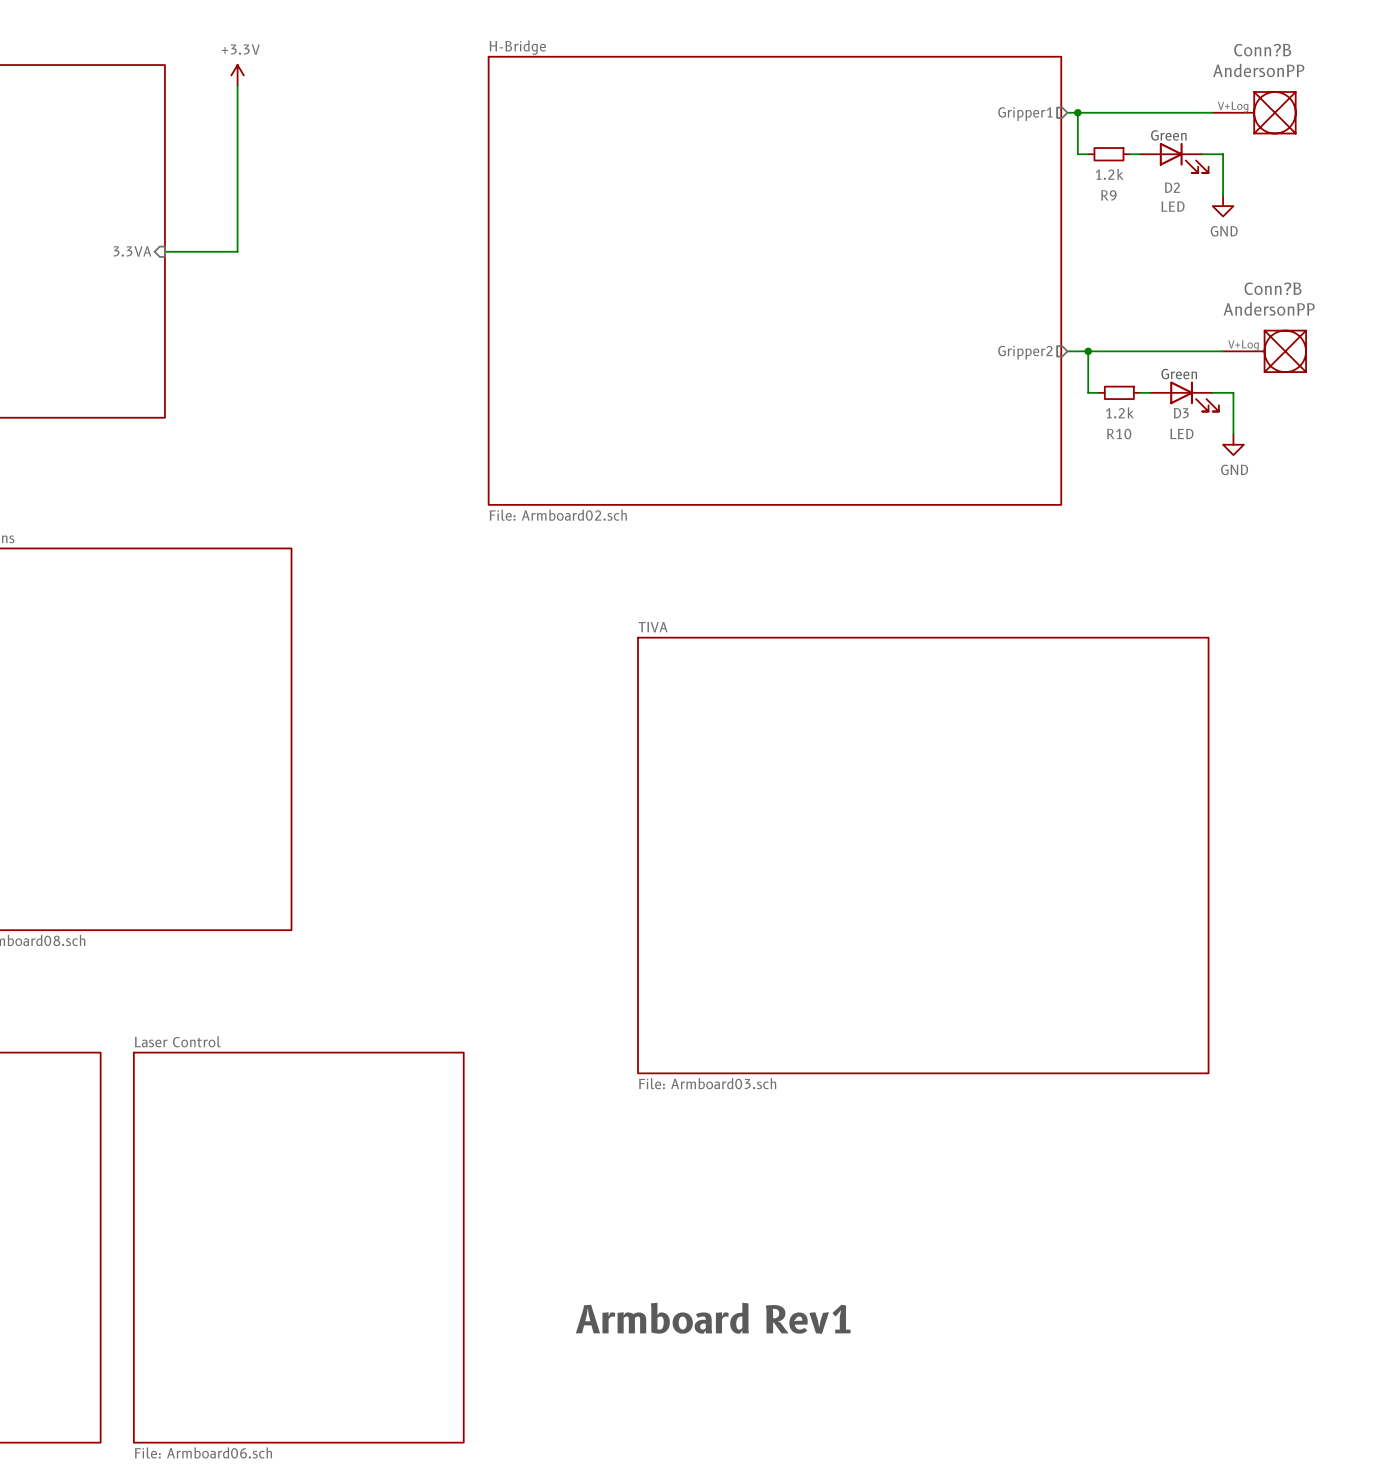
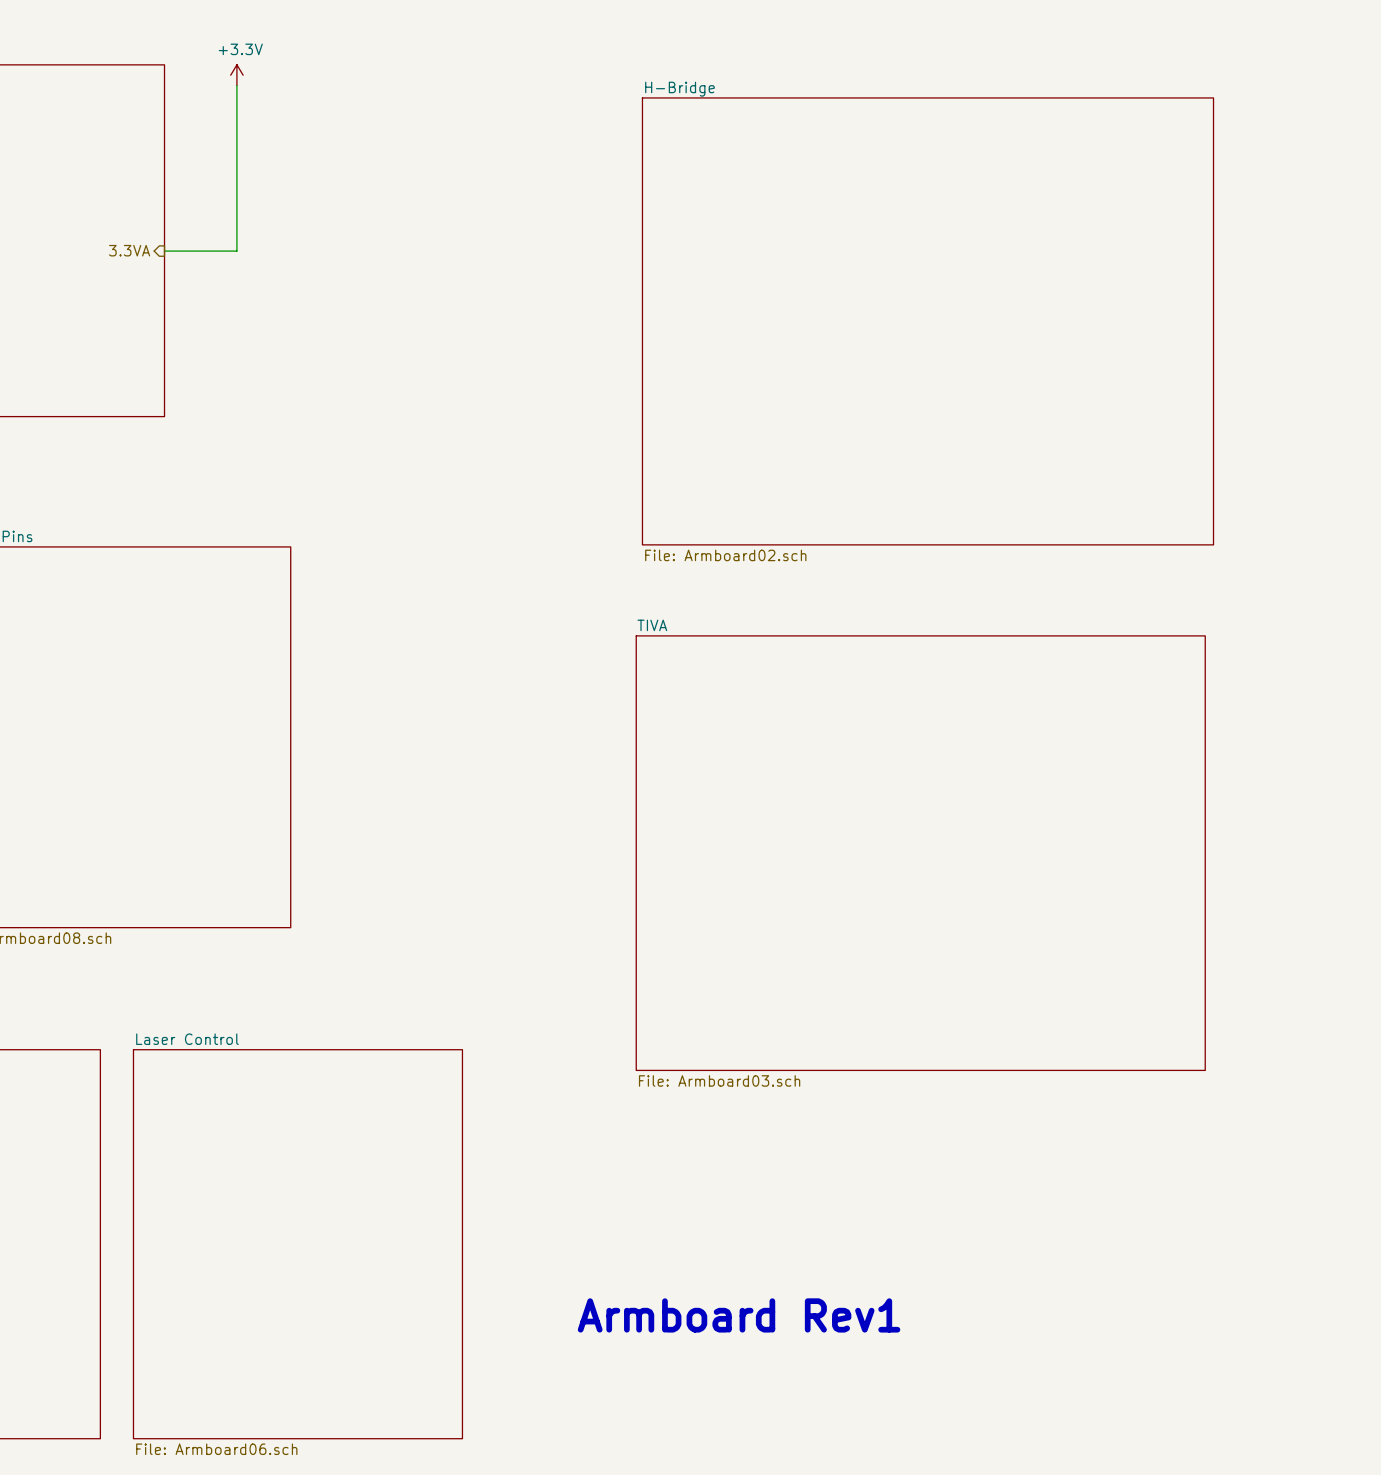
wire: (1067, 112) (1212, 112) -> none
wire: (1077, 112) (1077, 154) (1088, 154) -> none
junction: (1077, 112) -> none
Conn?B: AndersonPP (1254, 112) -> none
hierarchical label: Gripper1 (1025, 114) -> none
text: Green (1168, 135) -> none
R9: 1.2k (1108, 154) -> none
wire: (1129, 154) (1140, 154) -> none
wire: (1202, 154) (1223, 154) (1223, 195) -> none
D2: LED (1174, 157) -> none
power symbol: GND (1223, 206) -> none
sheet H-Bridge position: (774, 280) -> (927, 321)
wire: (1067, 351) (1223, 351) -> none
wire: (1088, 351) (1088, 392) (1098, 392) -> none
junction: (1088, 351) -> none
Conn?B: AndersonPP (1264, 351) -> none
hierarchical label: Gripper2 (1025, 352) -> none
text: Green (1179, 374) -> none
R10: 1.2k (1119, 392) -> none
wire: (1140, 392) (1150, 392) -> none
wire: (1212, 392) (1233, 392) (1233, 434) -> none
D3: LED (1184, 396) -> none
power symbol: GND (1233, 444) -> none

